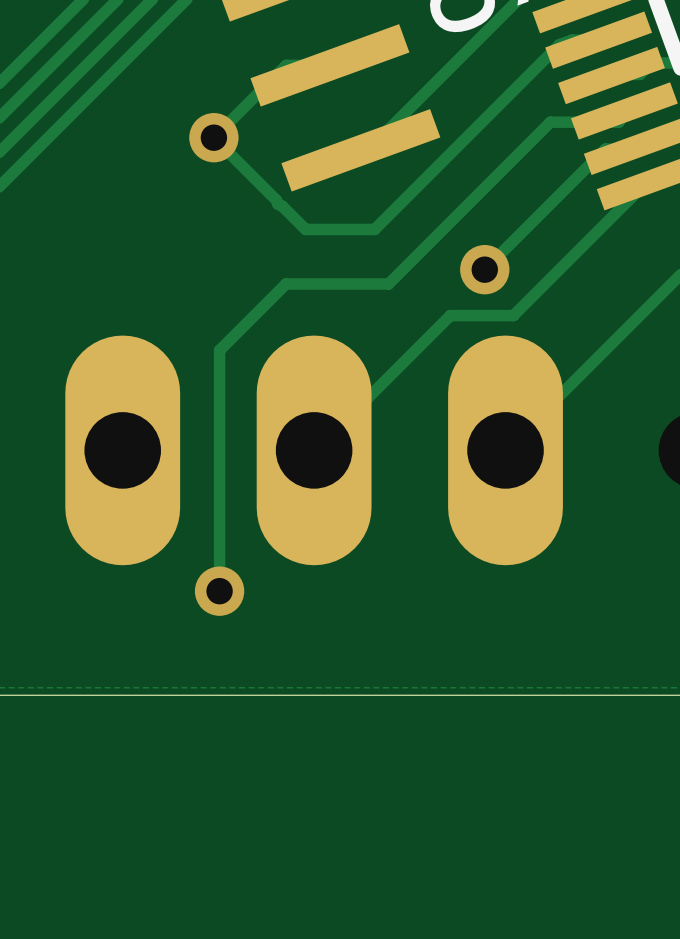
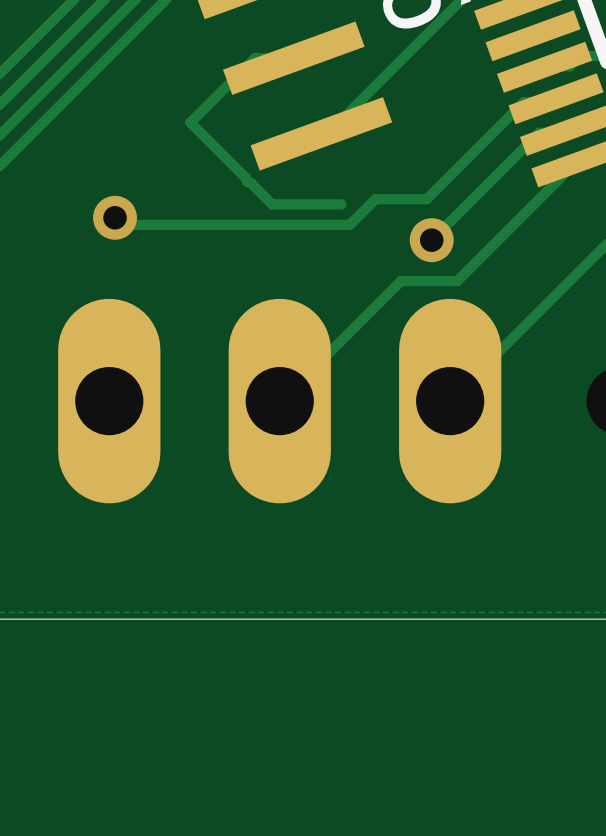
track: (598, 40) (571, 40) (559, 44) (374, 229) -> (341, 204) (333, 204)
track: (622, 114) (618, 122) (550, 122) (388, 284) (285, 284) (219, 350) (219, 591) -> (554, 102) (523, 102) (426, 199) (375, 199) (349, 224) (122, 224) (115, 217)
via position: (213, 137) -> (115, 217)
via: (219, 591) -> none

